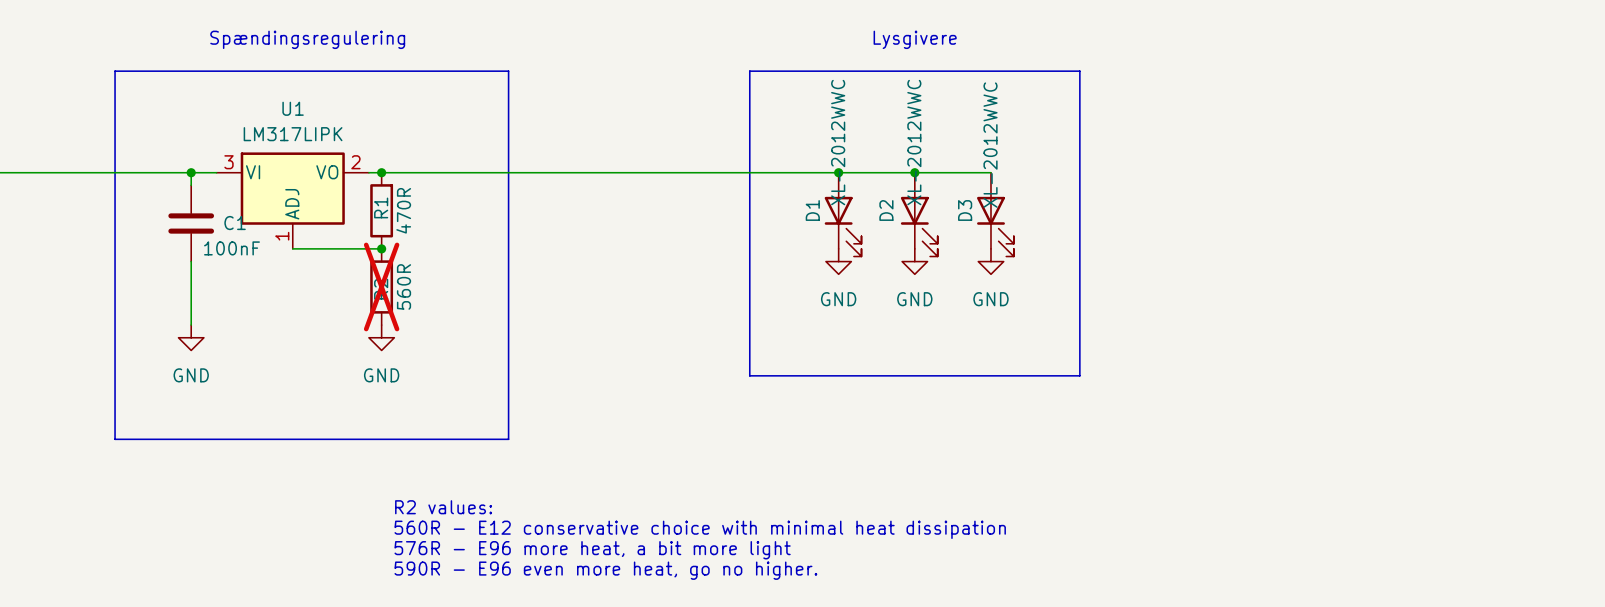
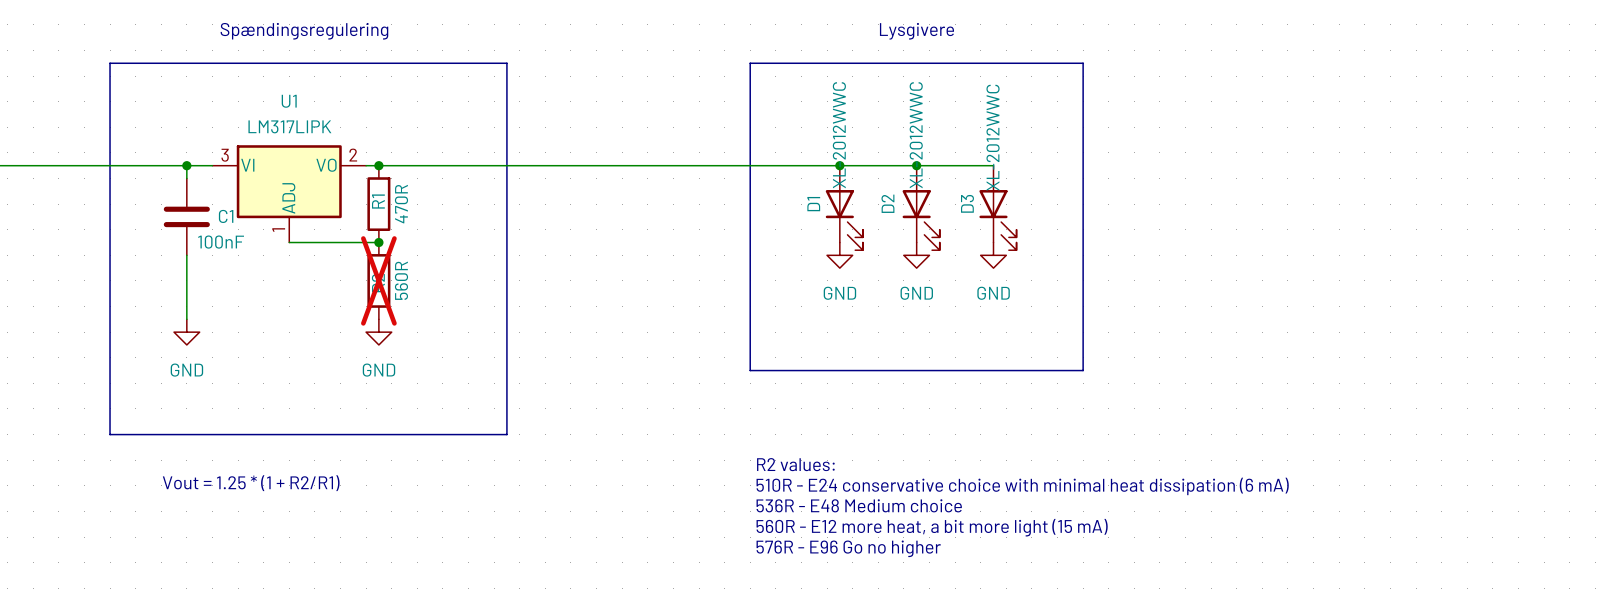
text: none -> R2 values: (795, 464)
text: none -> Vout = 1.25 * (1 + R2/R1) (251, 483)
text: none -> 510R - E24 conservative choice with minimal heat dissipation (6 mA) (1022, 486)
text: R2 values: (443, 507) -> none
text: none -> 536R - E48 Medium choice (859, 505)
text: 560R - E12 conservative choice with minimal heat dissipation (700, 529) -> none
text: none -> 560R - E12 more heat, a bit more light (15 mA) (932, 527)
text: 576R - E96 more heat, a bit more light (592, 550) -> none
text: none -> 576R - E96 Go no higher (848, 548)
text: 590R - E96 even more heat, go no higher. (605, 570) -> none

